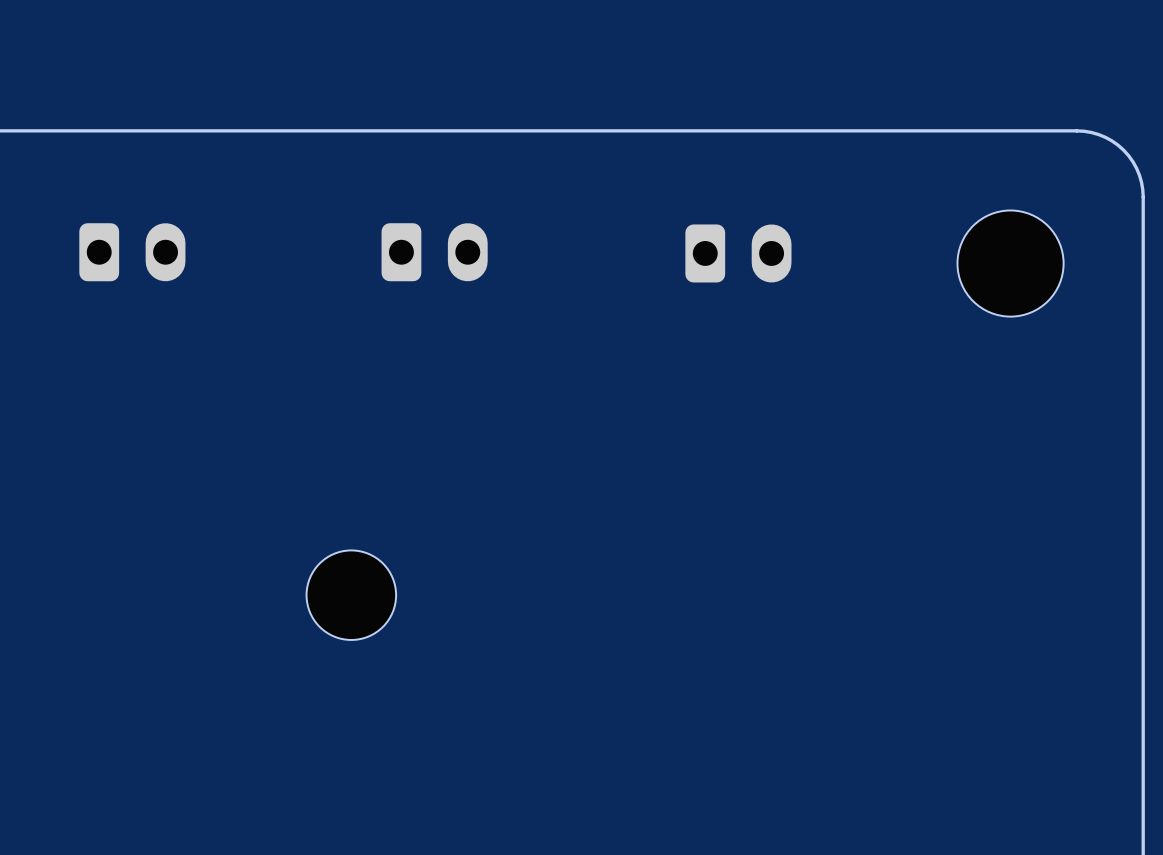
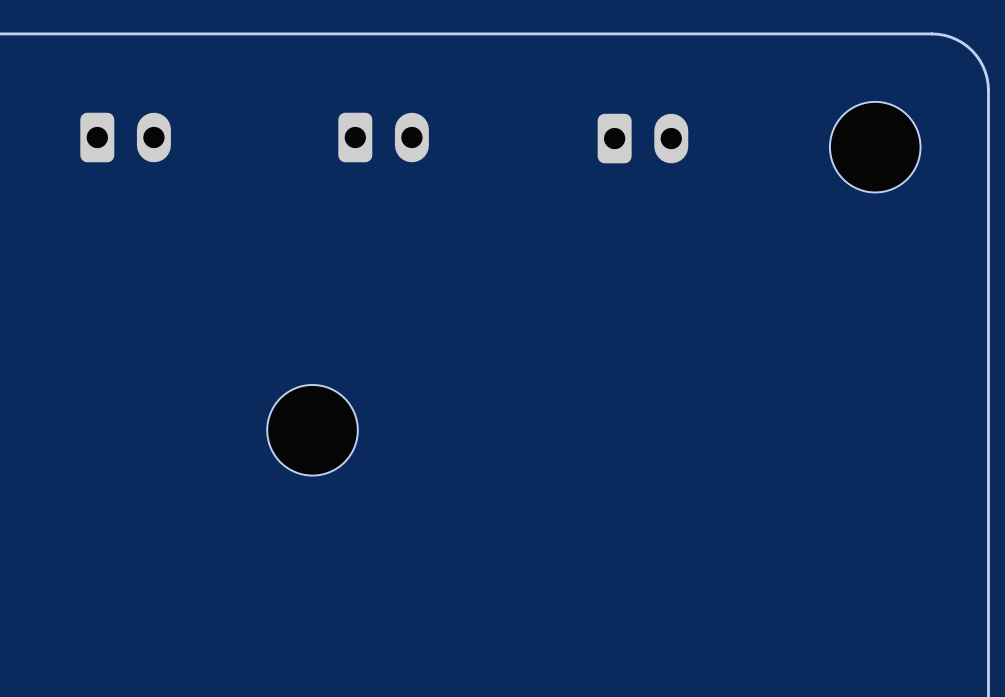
part footprint: [306, 550, 397, 640] -> [267, 384, 358, 476]

